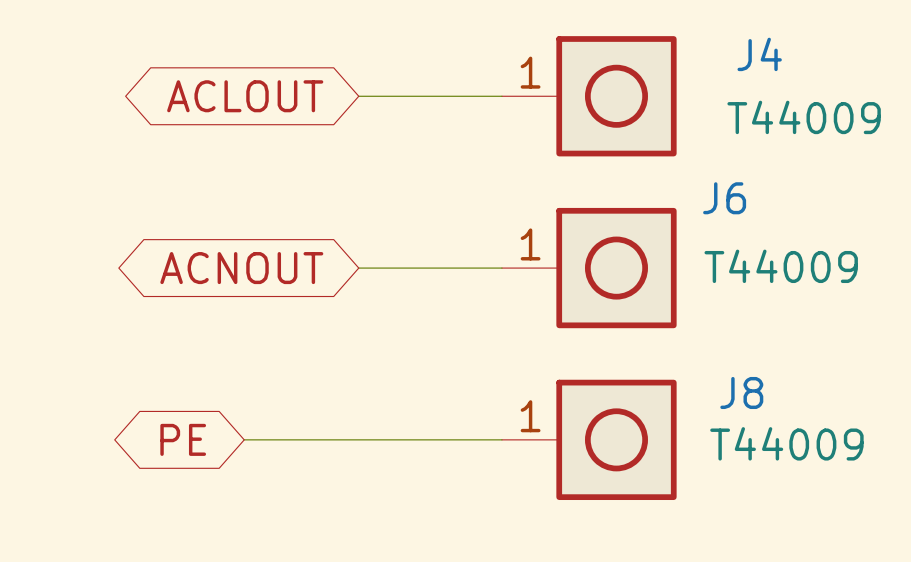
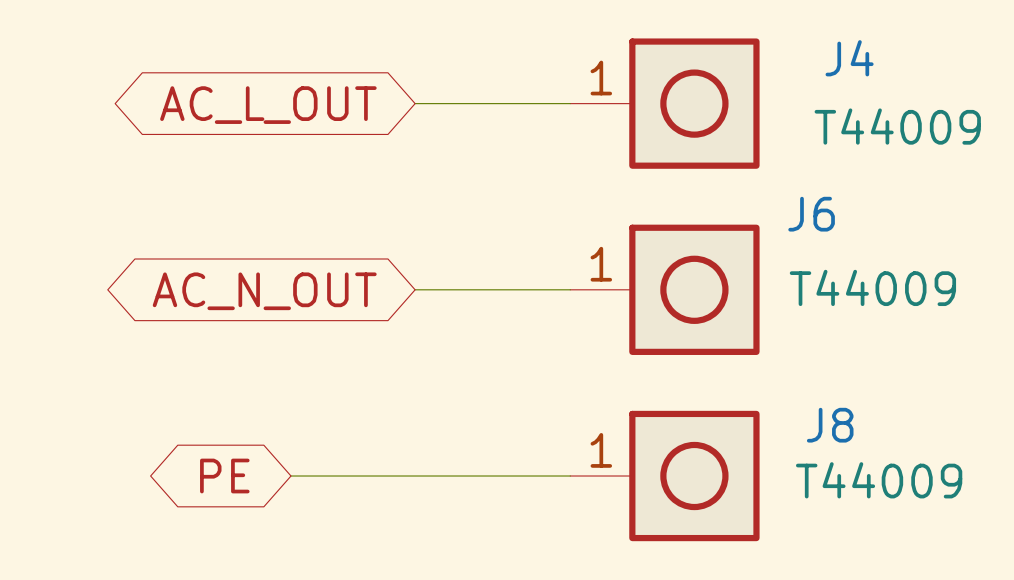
global label: ACLOUT (245, 96) -> AC_L_OUT (268, 105)
global label: ACNOUT (241, 268) -> AC_N_OUT (264, 291)

